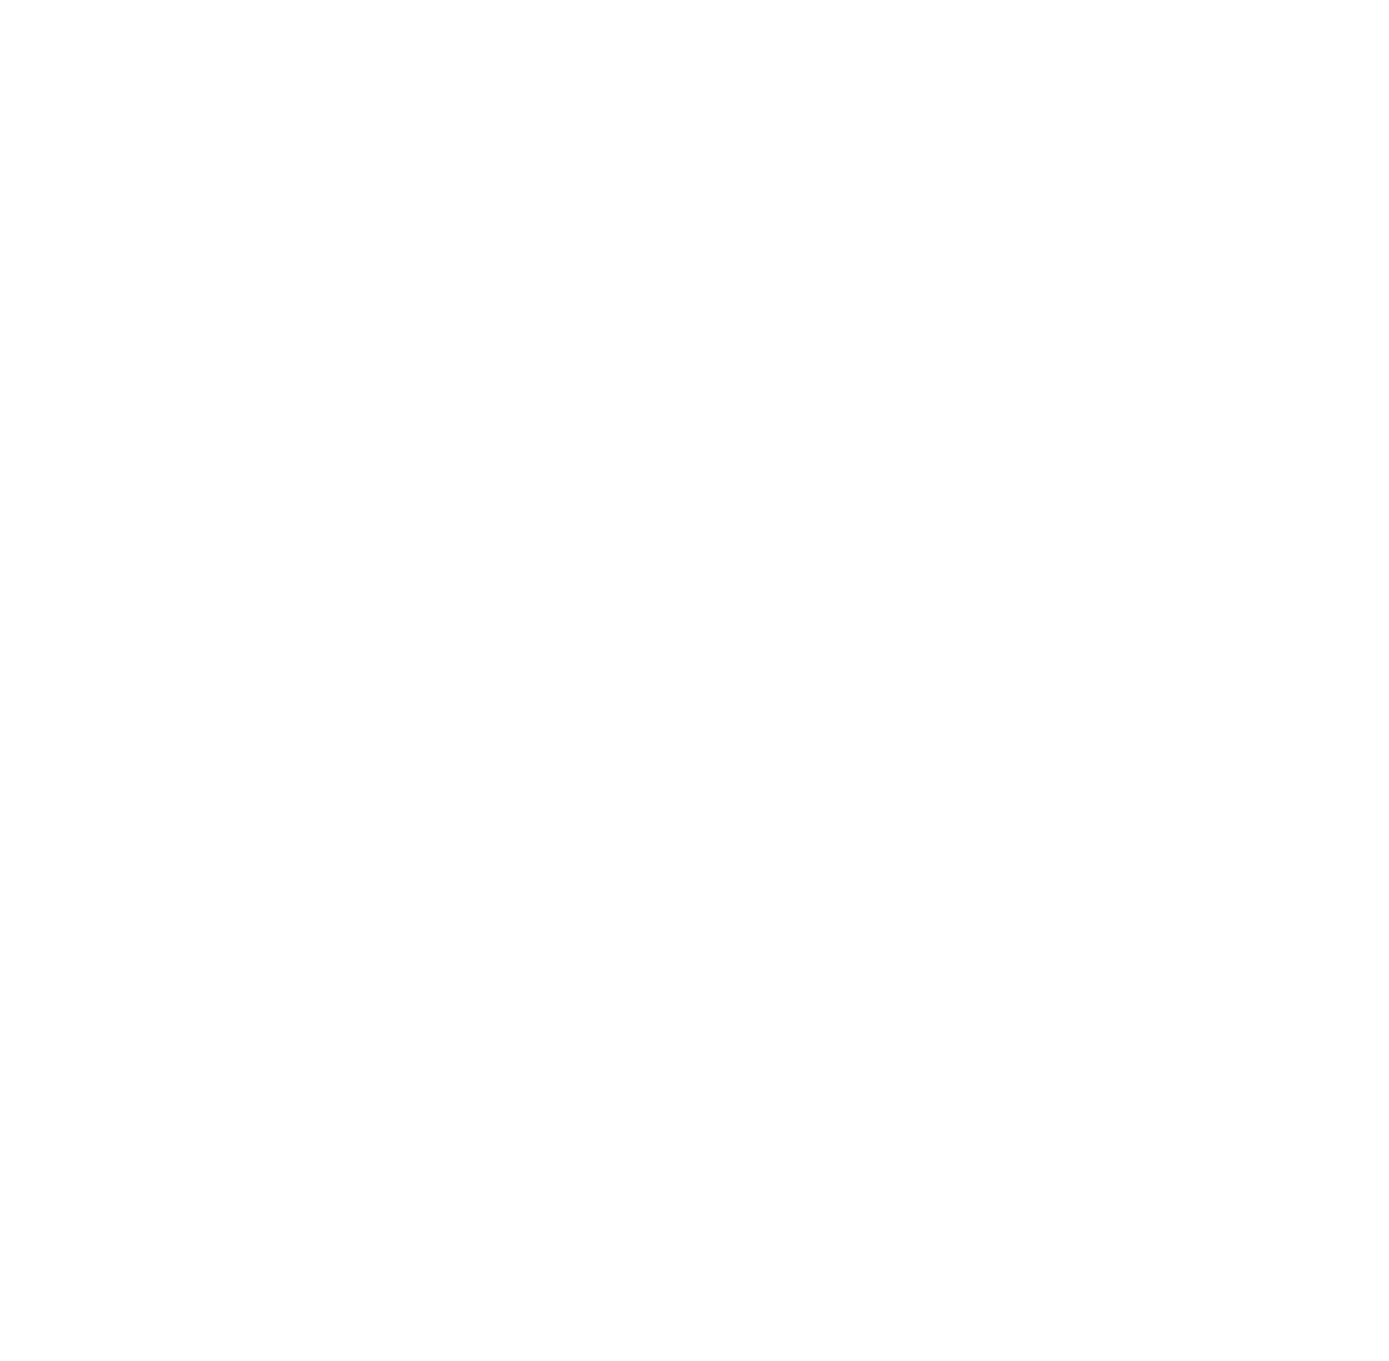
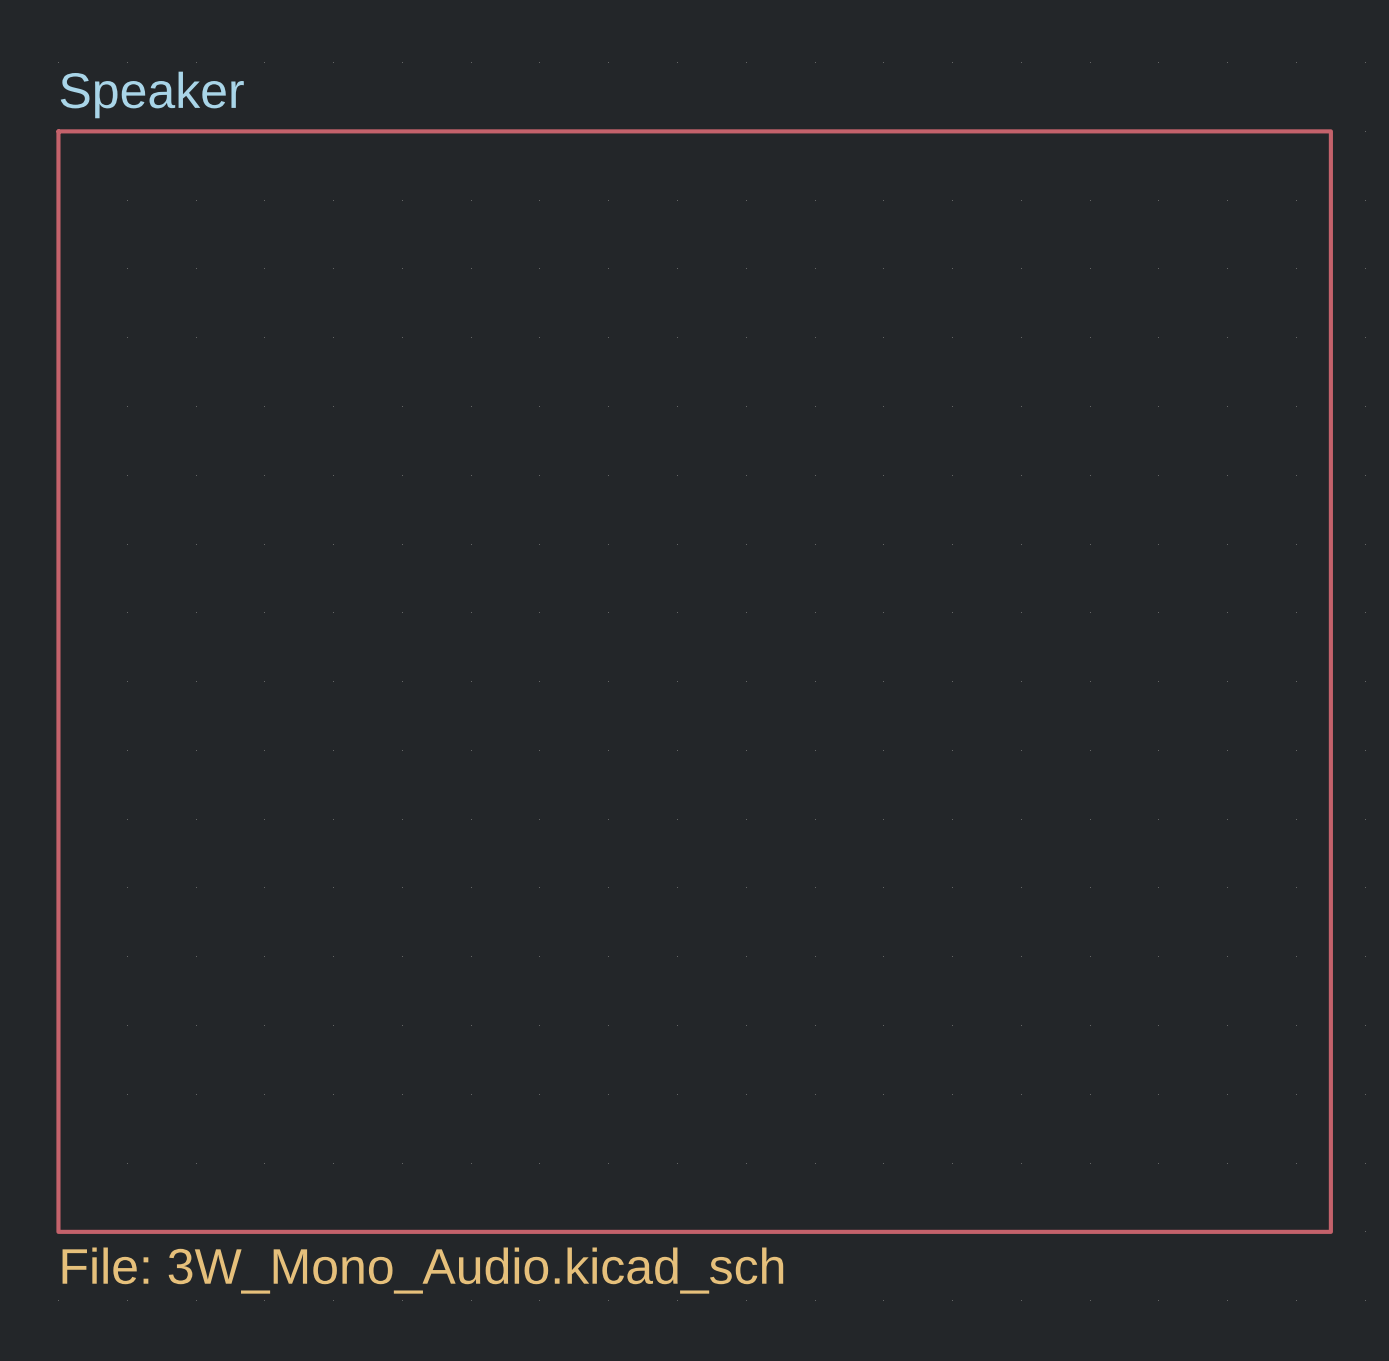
sheet Speaker: none -> File: 3W_Mono_Audio.kicad_sch (694, 681)

